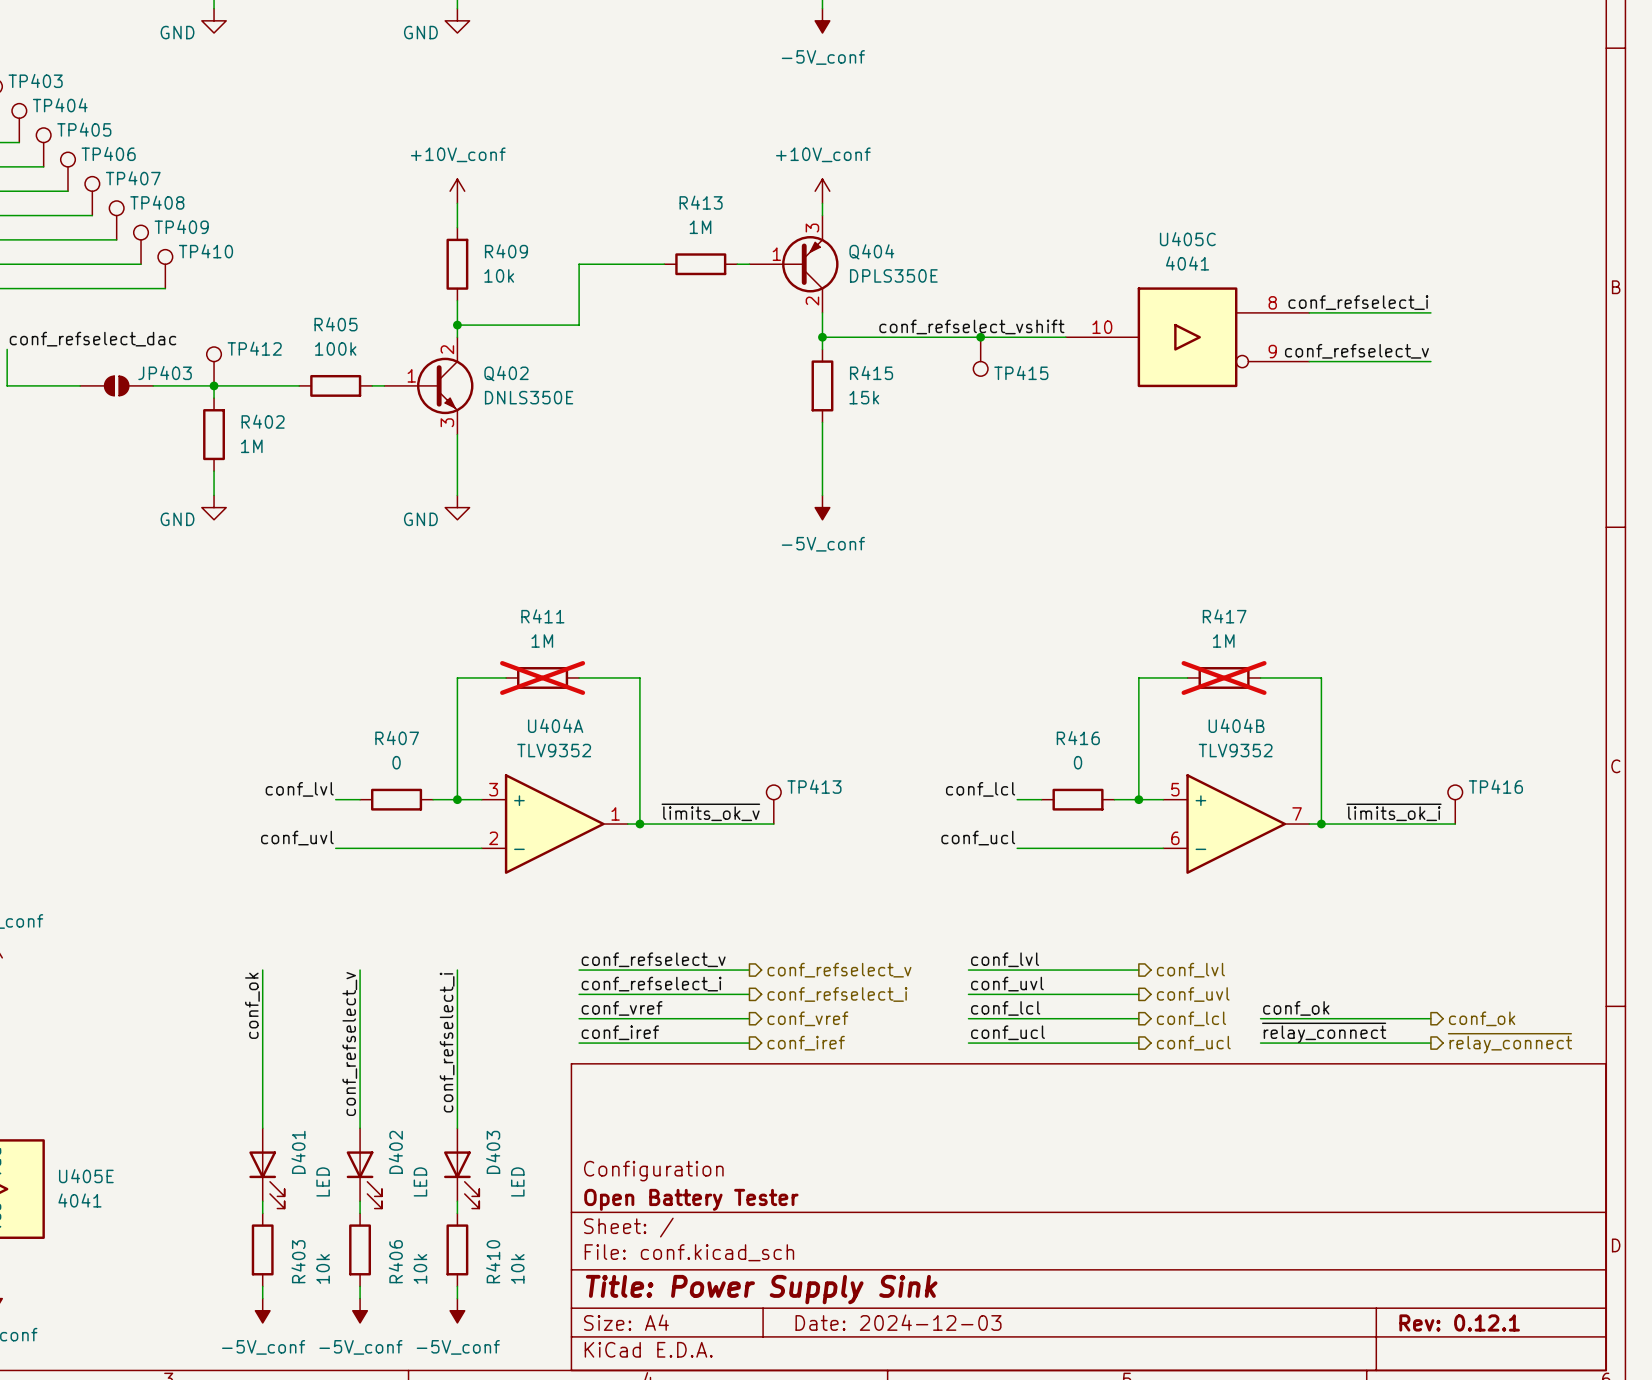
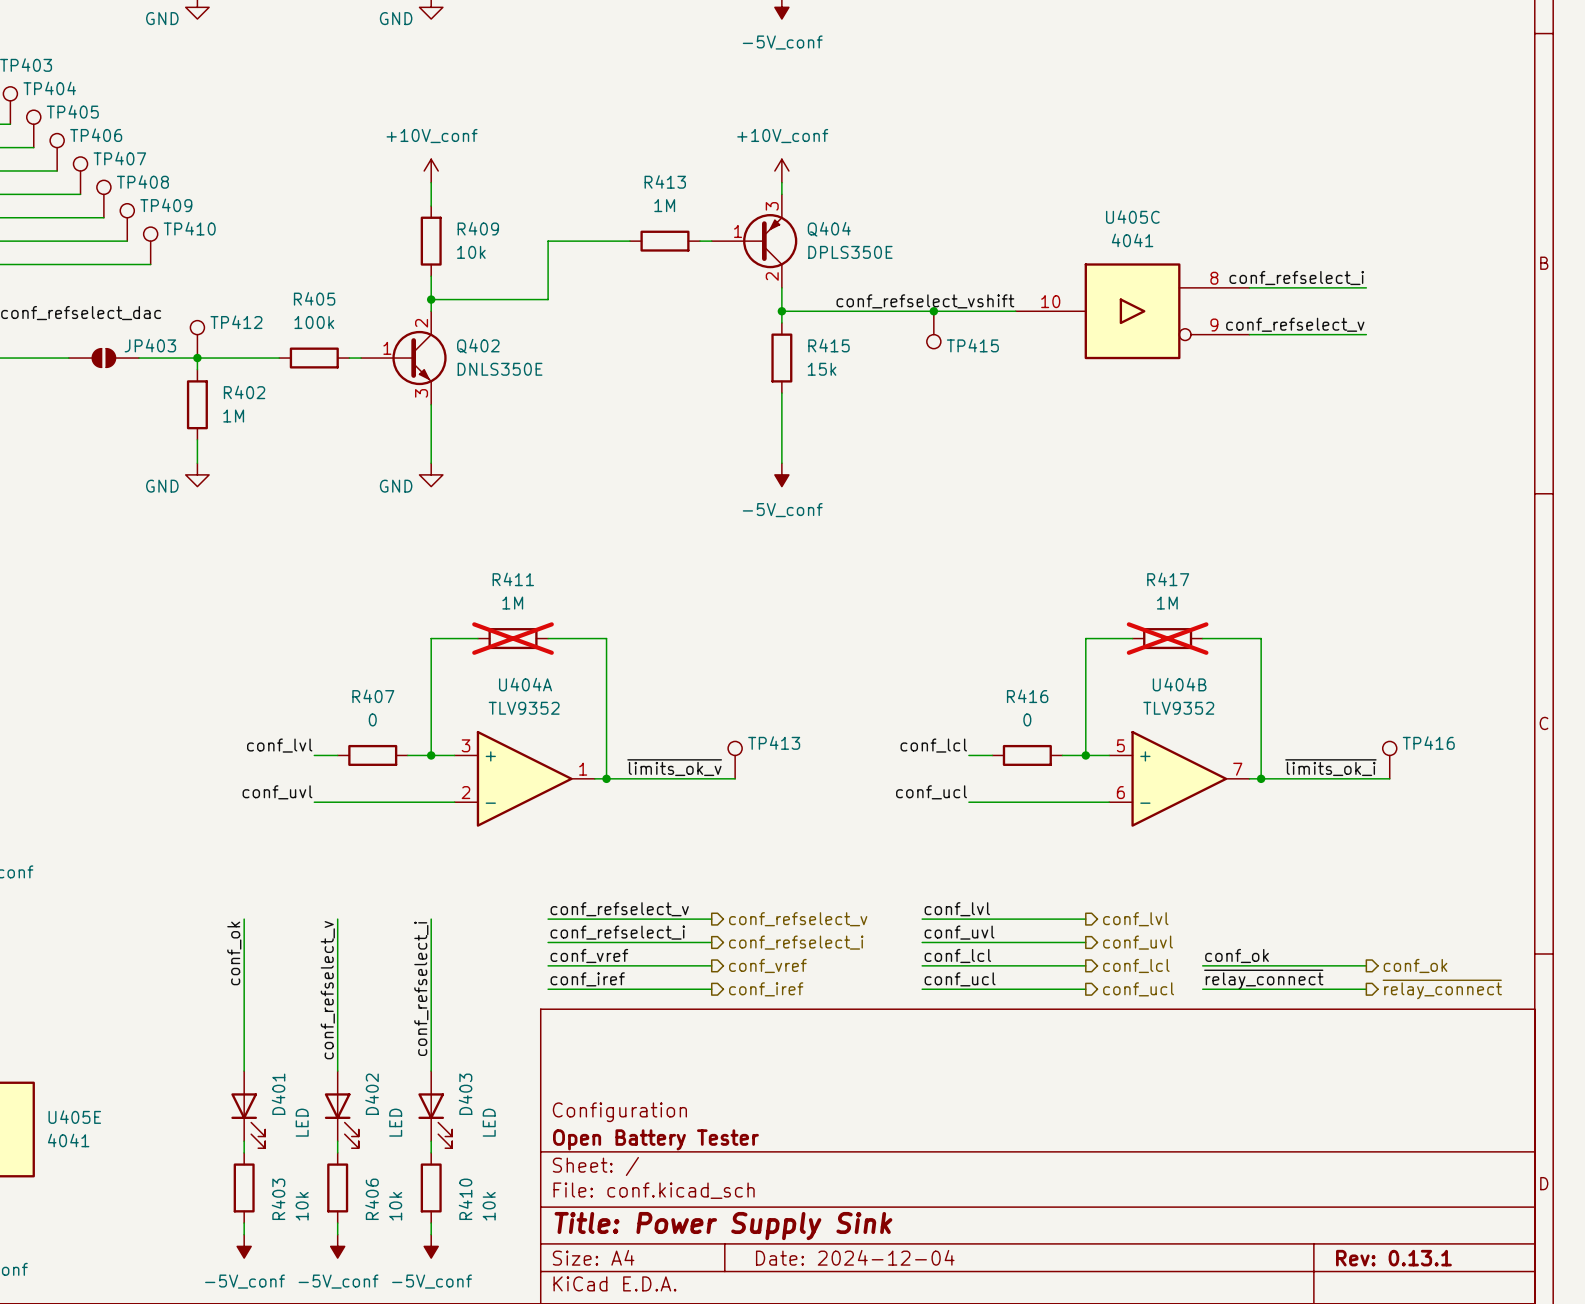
title block: Date: 2024-12-03 (898, 1322) -> Date: 2024-12-04 (855, 1257)
title block: Rev: 0.12.1 (1459, 1322) -> Rev: 0.13.1 (1393, 1258)

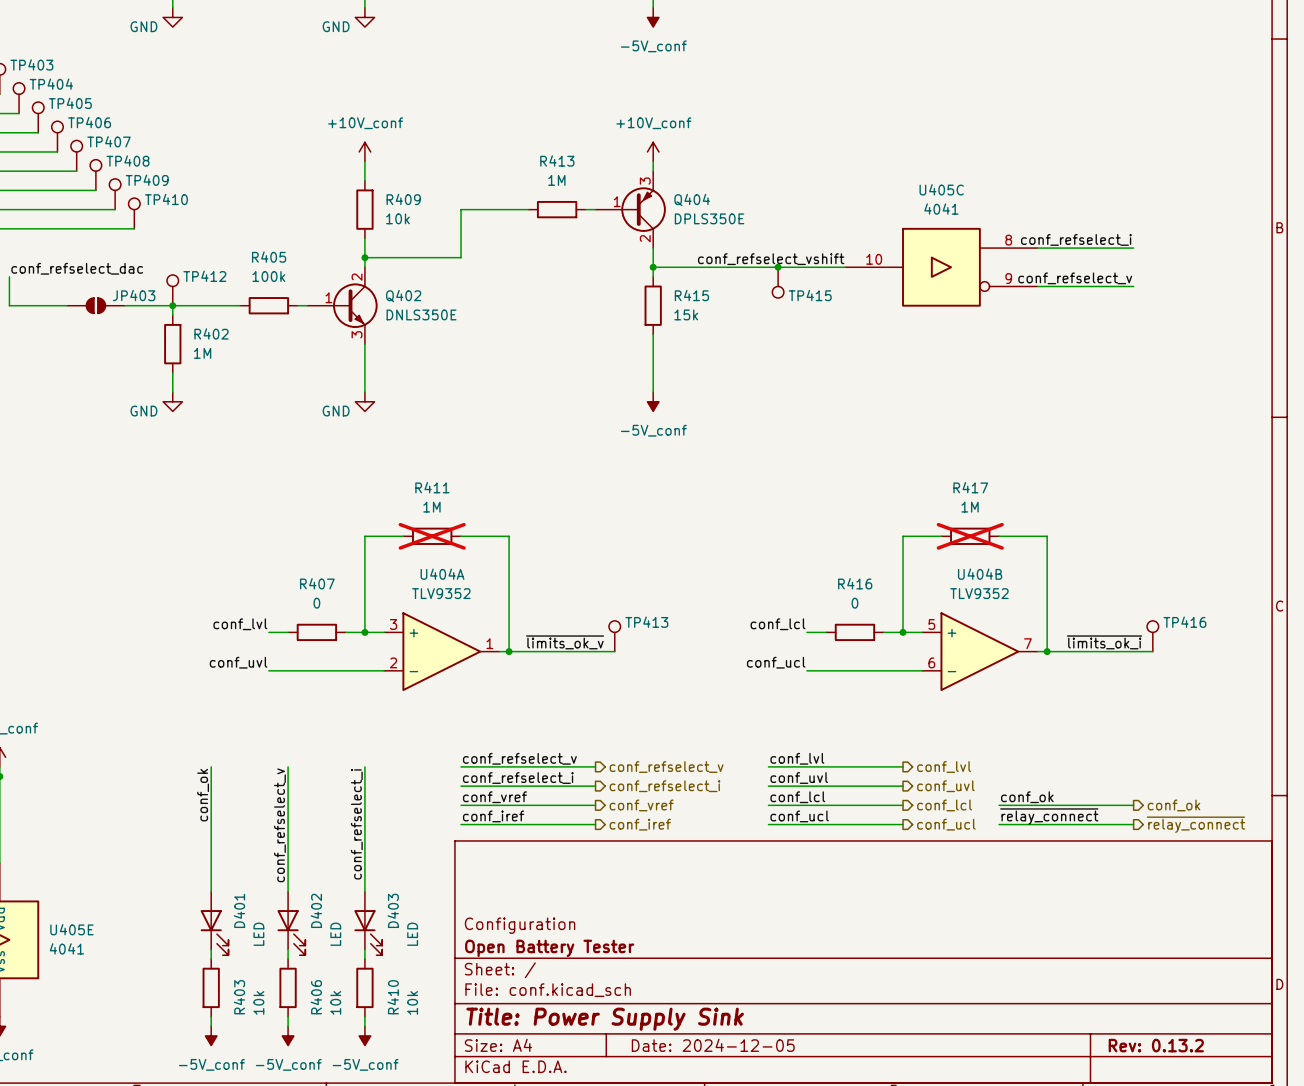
title block: Date: 2024-12-04 (855, 1257) -> Date: 2024-12-05 (713, 1045)
title block: Rev: 0.13.1 (1393, 1258) -> Rev: 0.13.2 (1156, 1045)

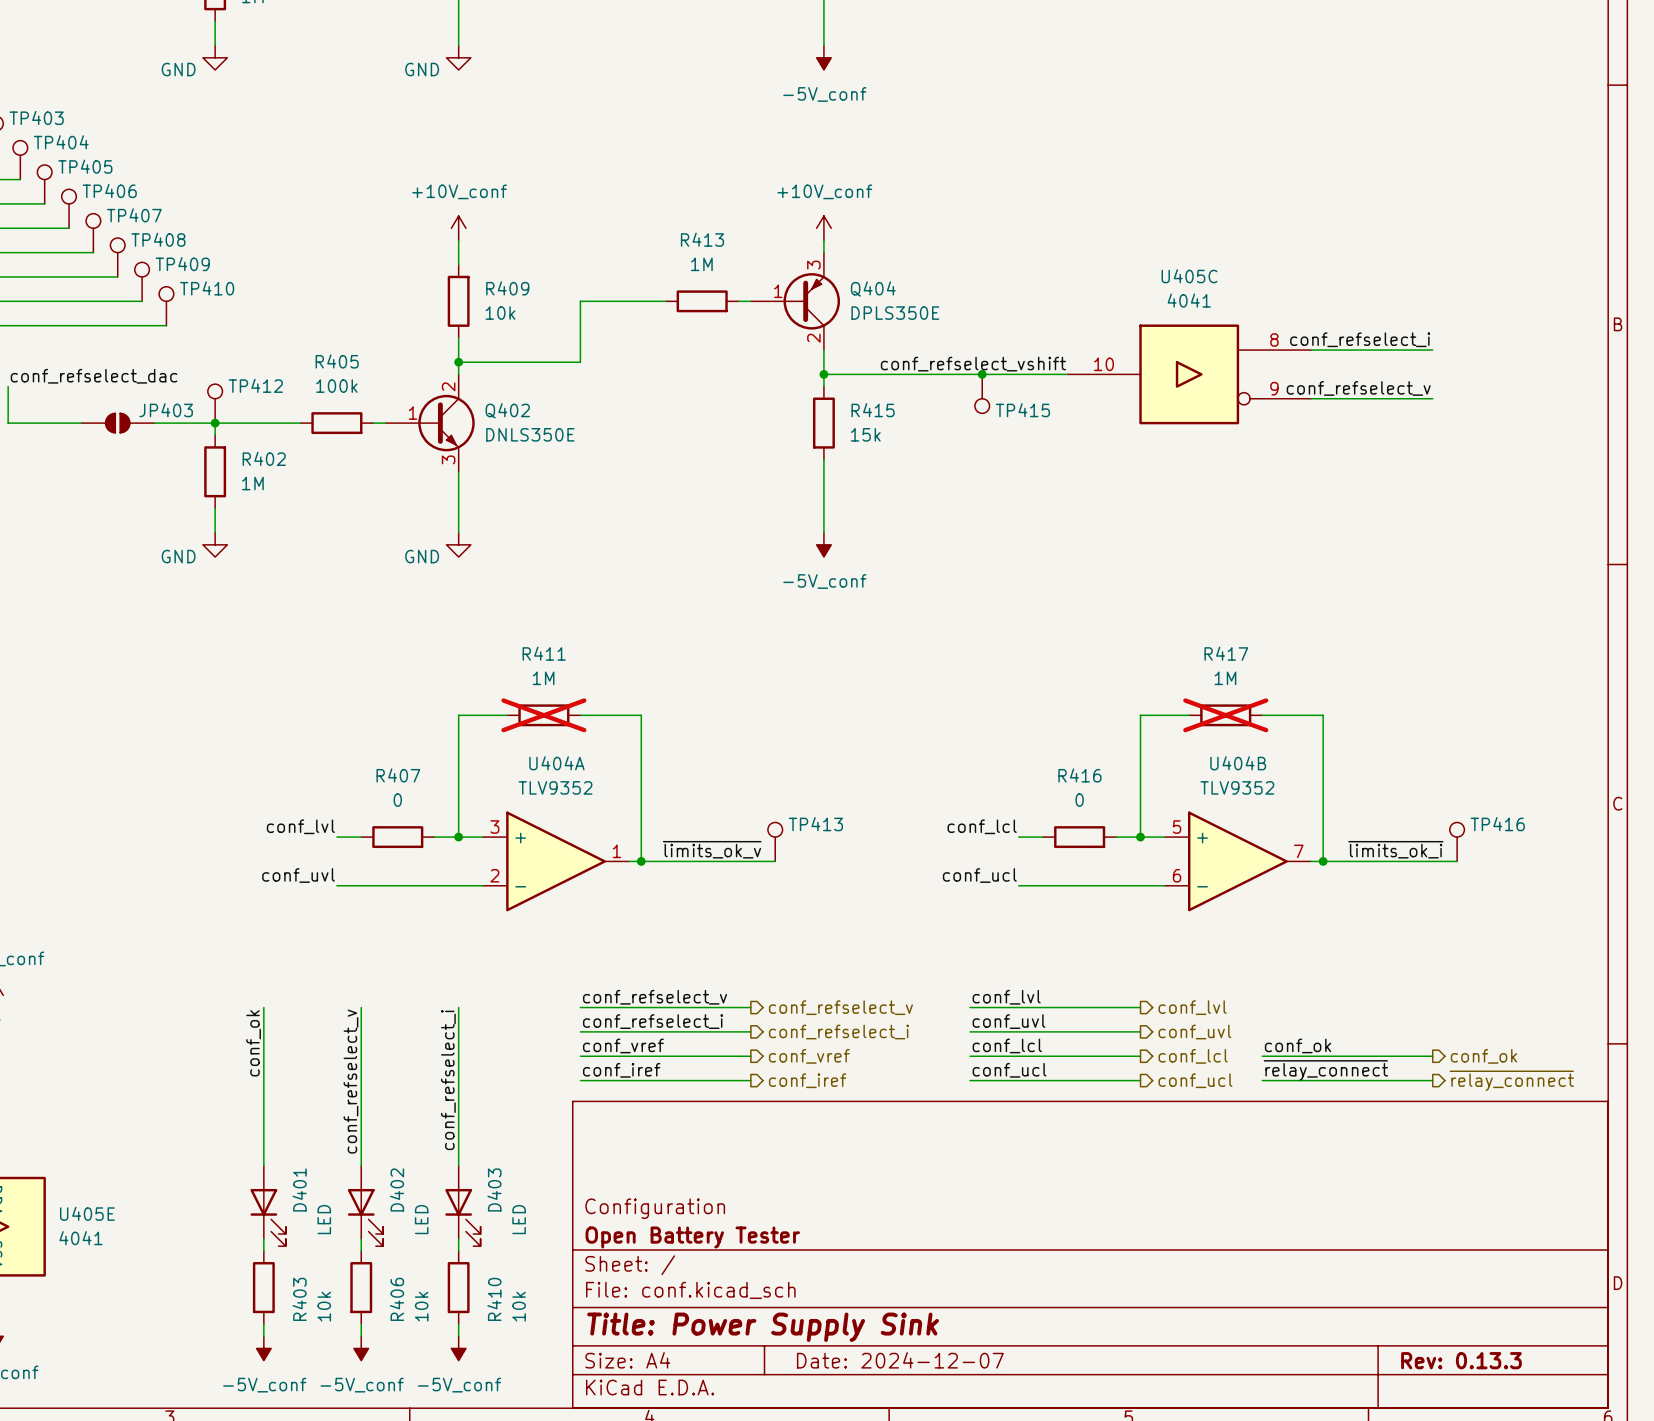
title block: Date: 2024-12-05 (713, 1045) -> Date: 2024-12-07 (900, 1360)
title block: Rev: 0.13.2 (1156, 1045) -> Rev: 0.13.3 (1461, 1360)

